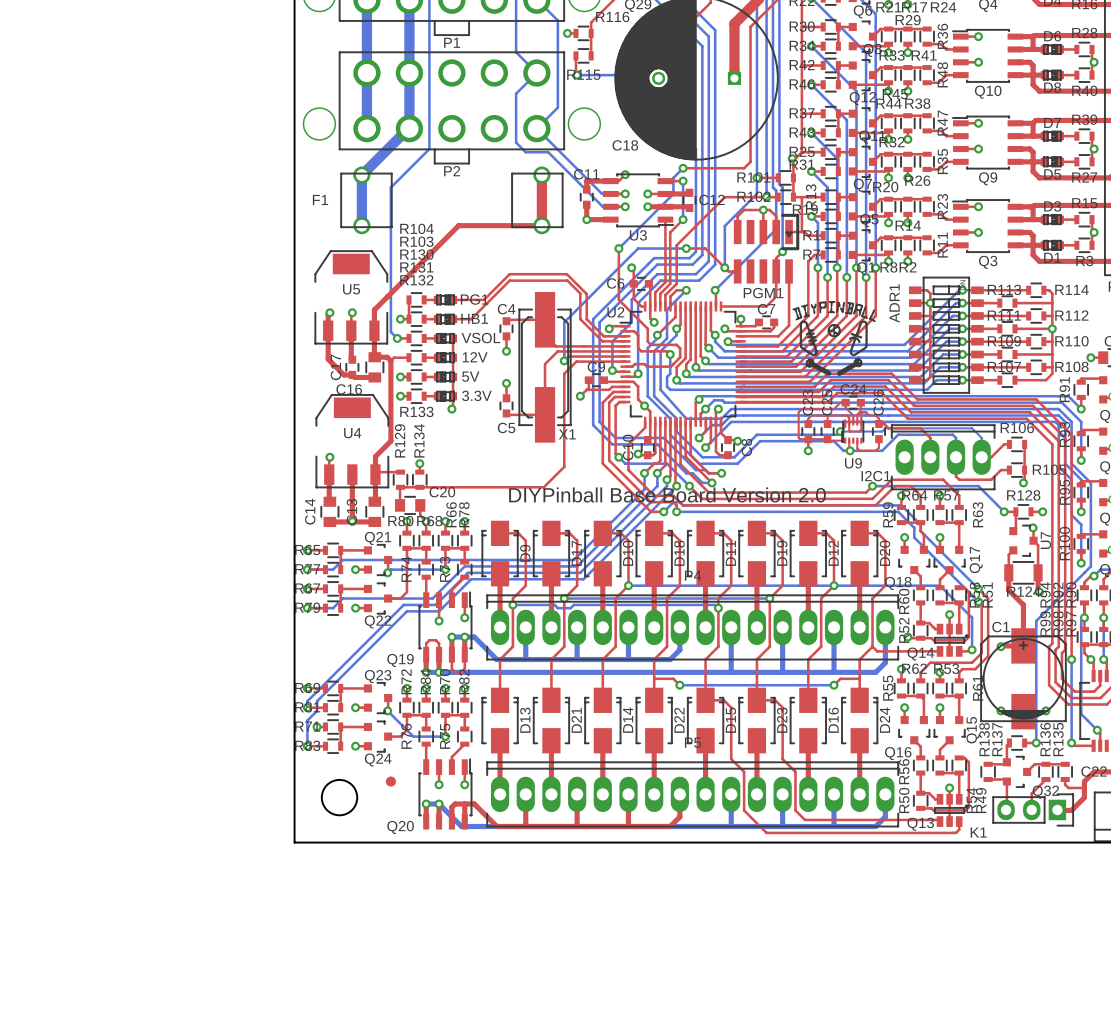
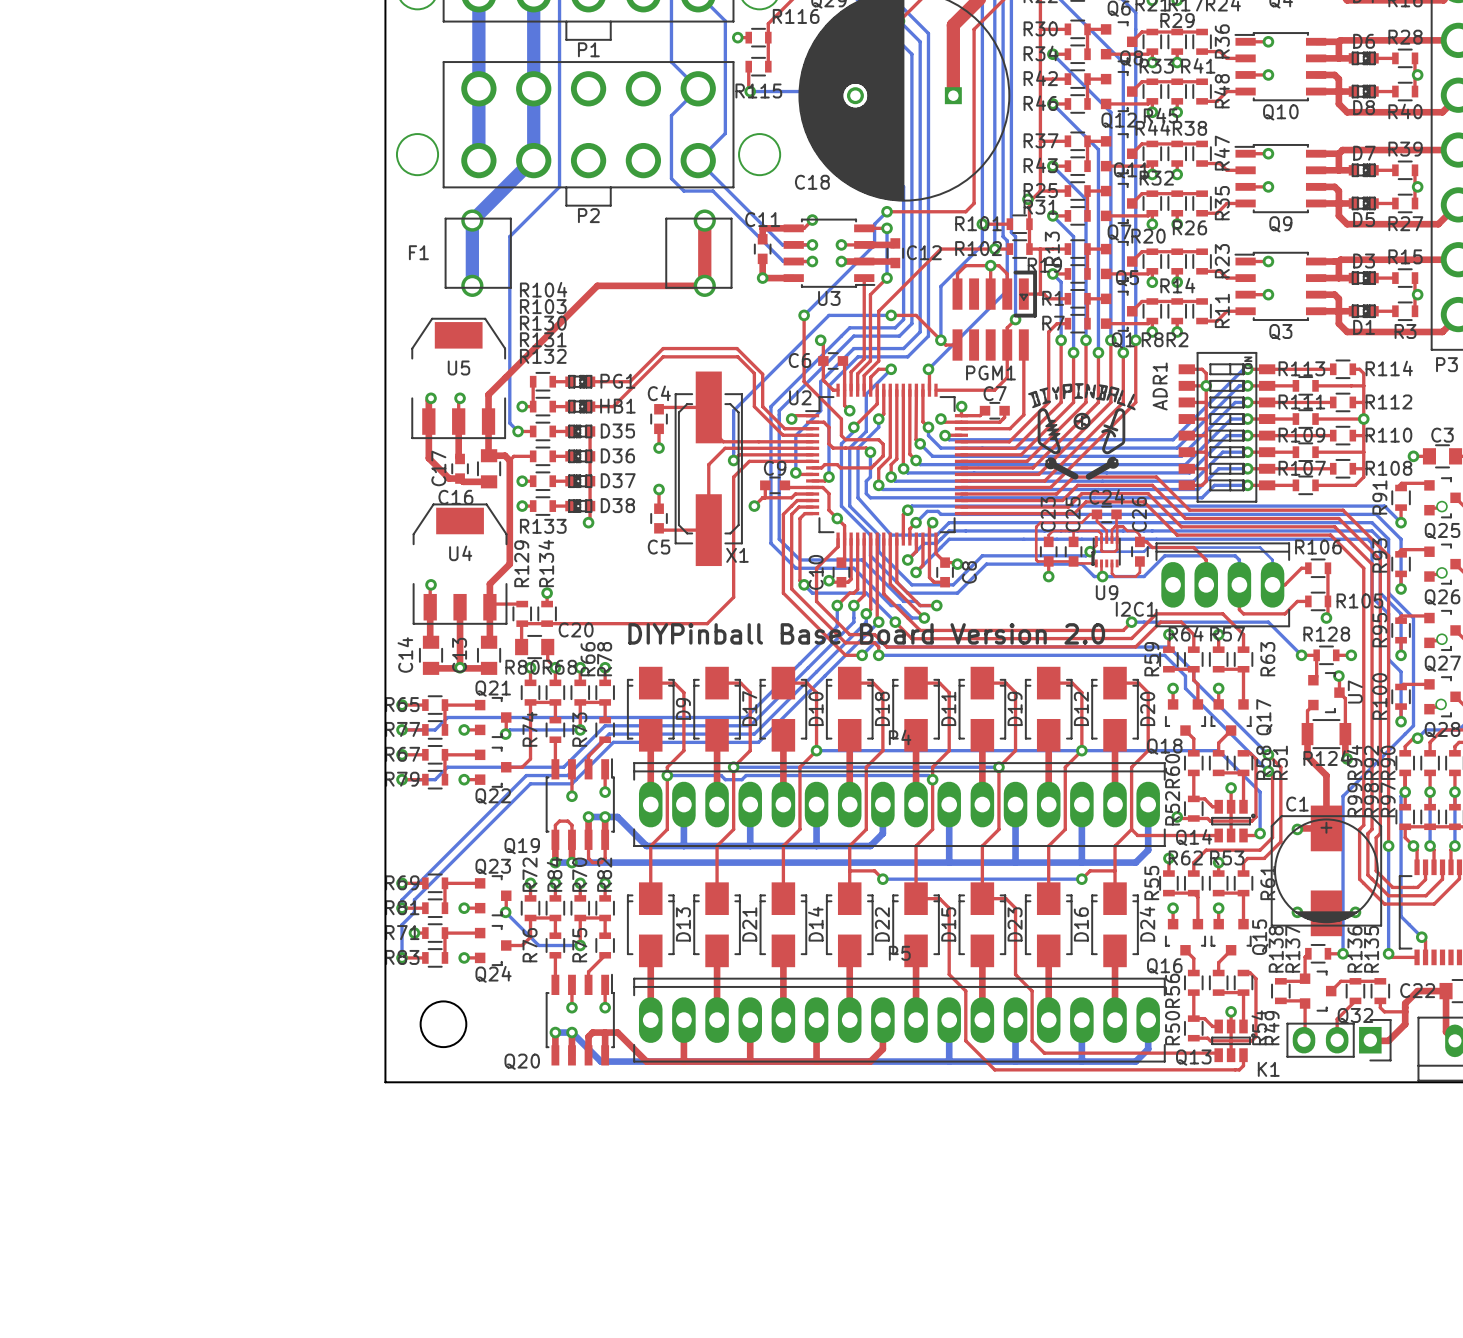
D35 name: none -> D35 (617, 430)
text: VSOL (480, 338) -> none
D36 name: none -> D36 (617, 455)
text: 12V (475, 357) -> none
text: 5V (470, 376) -> none
D37 name: none -> D37 (618, 480)
D38 name: none -> D38 (617, 505)
text: 3.3V (476, 395) -> none
part: (390, 781) -> none

